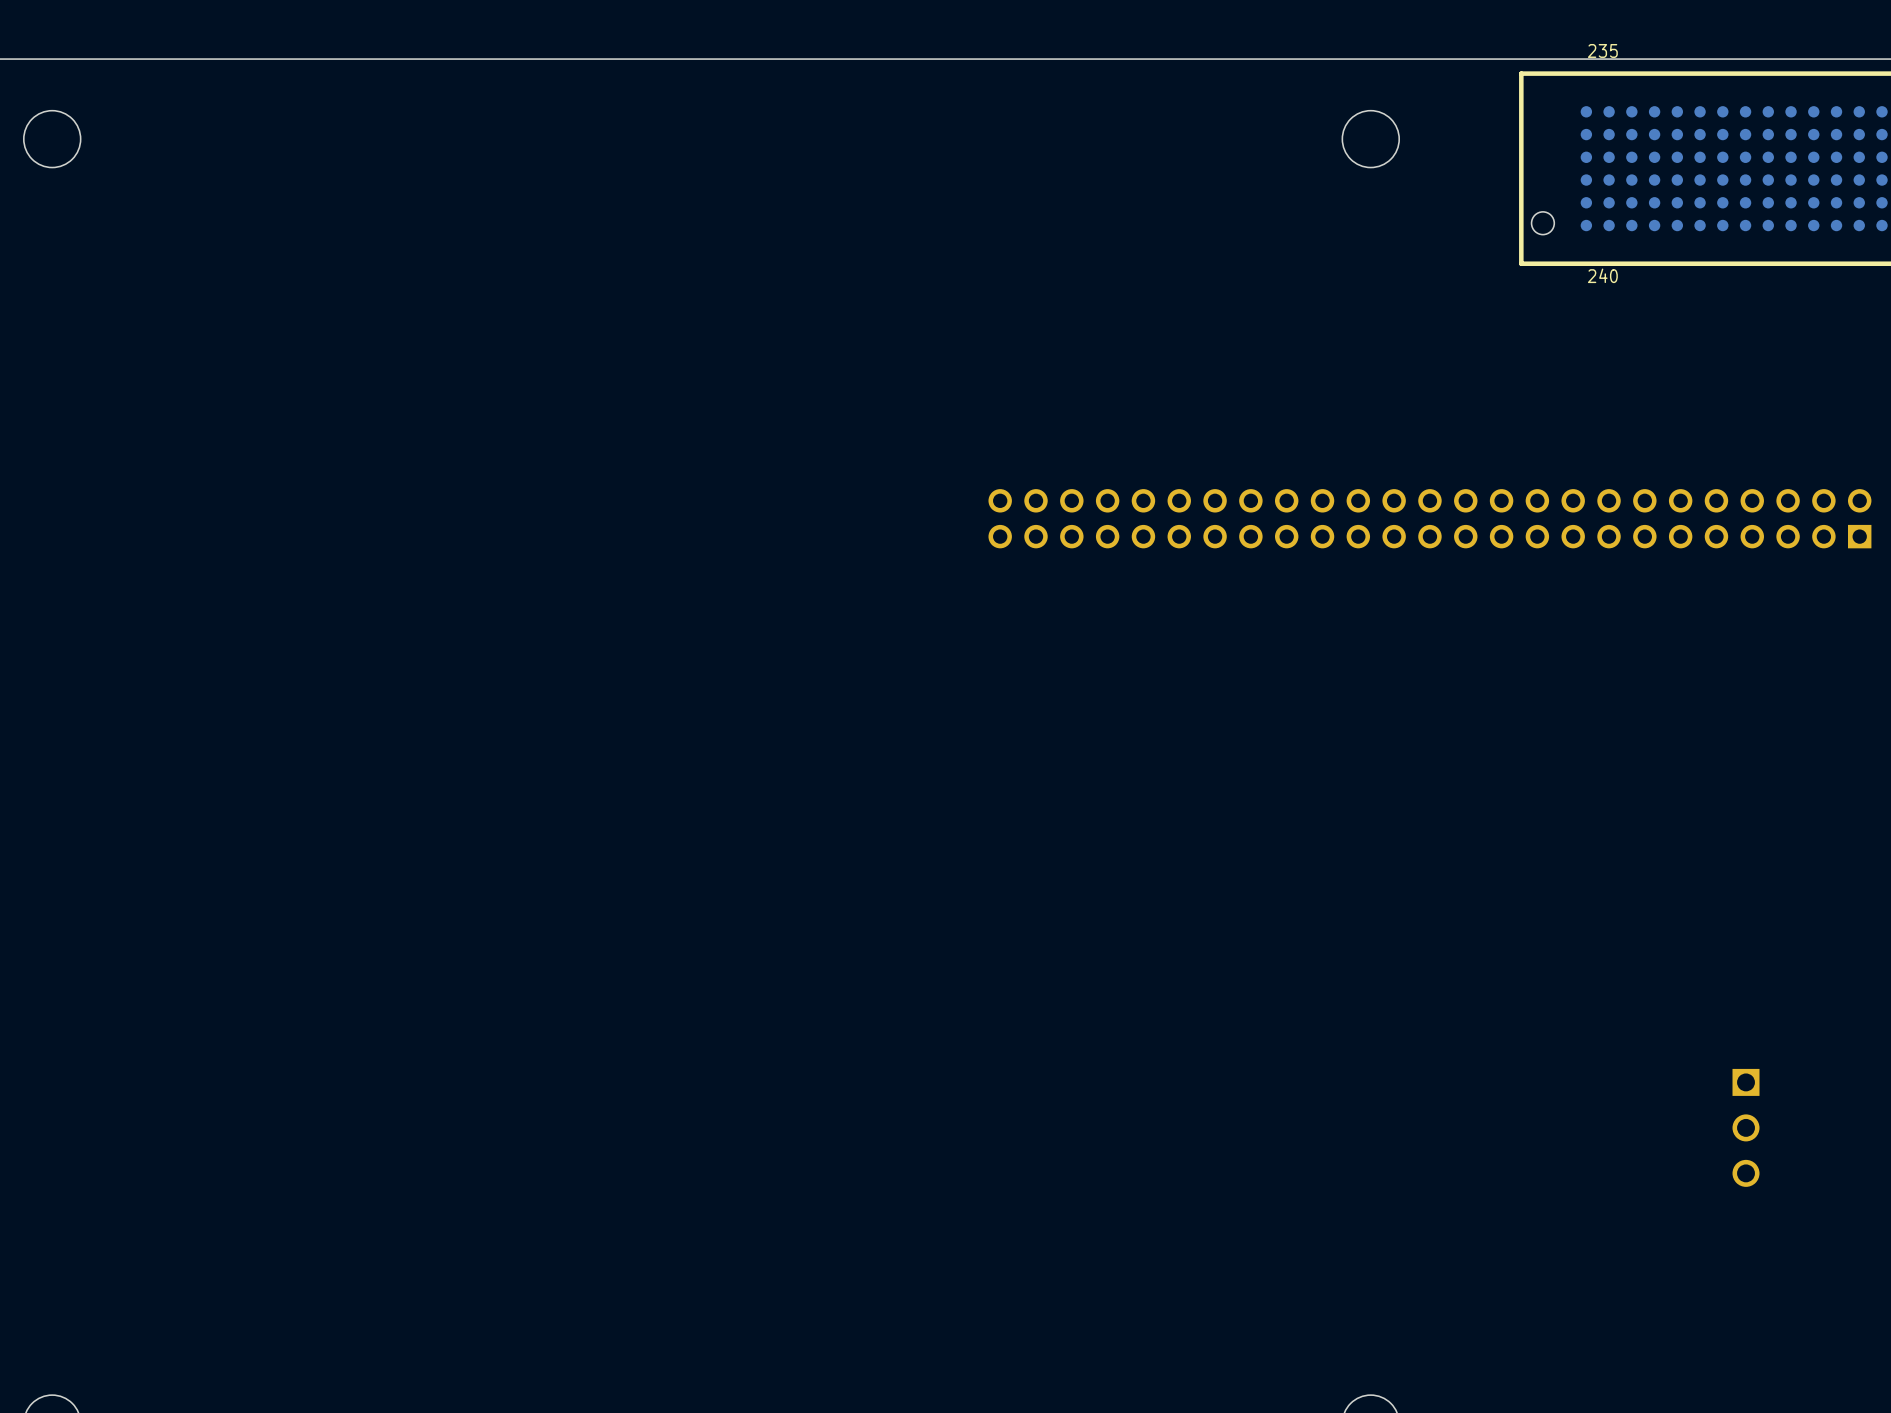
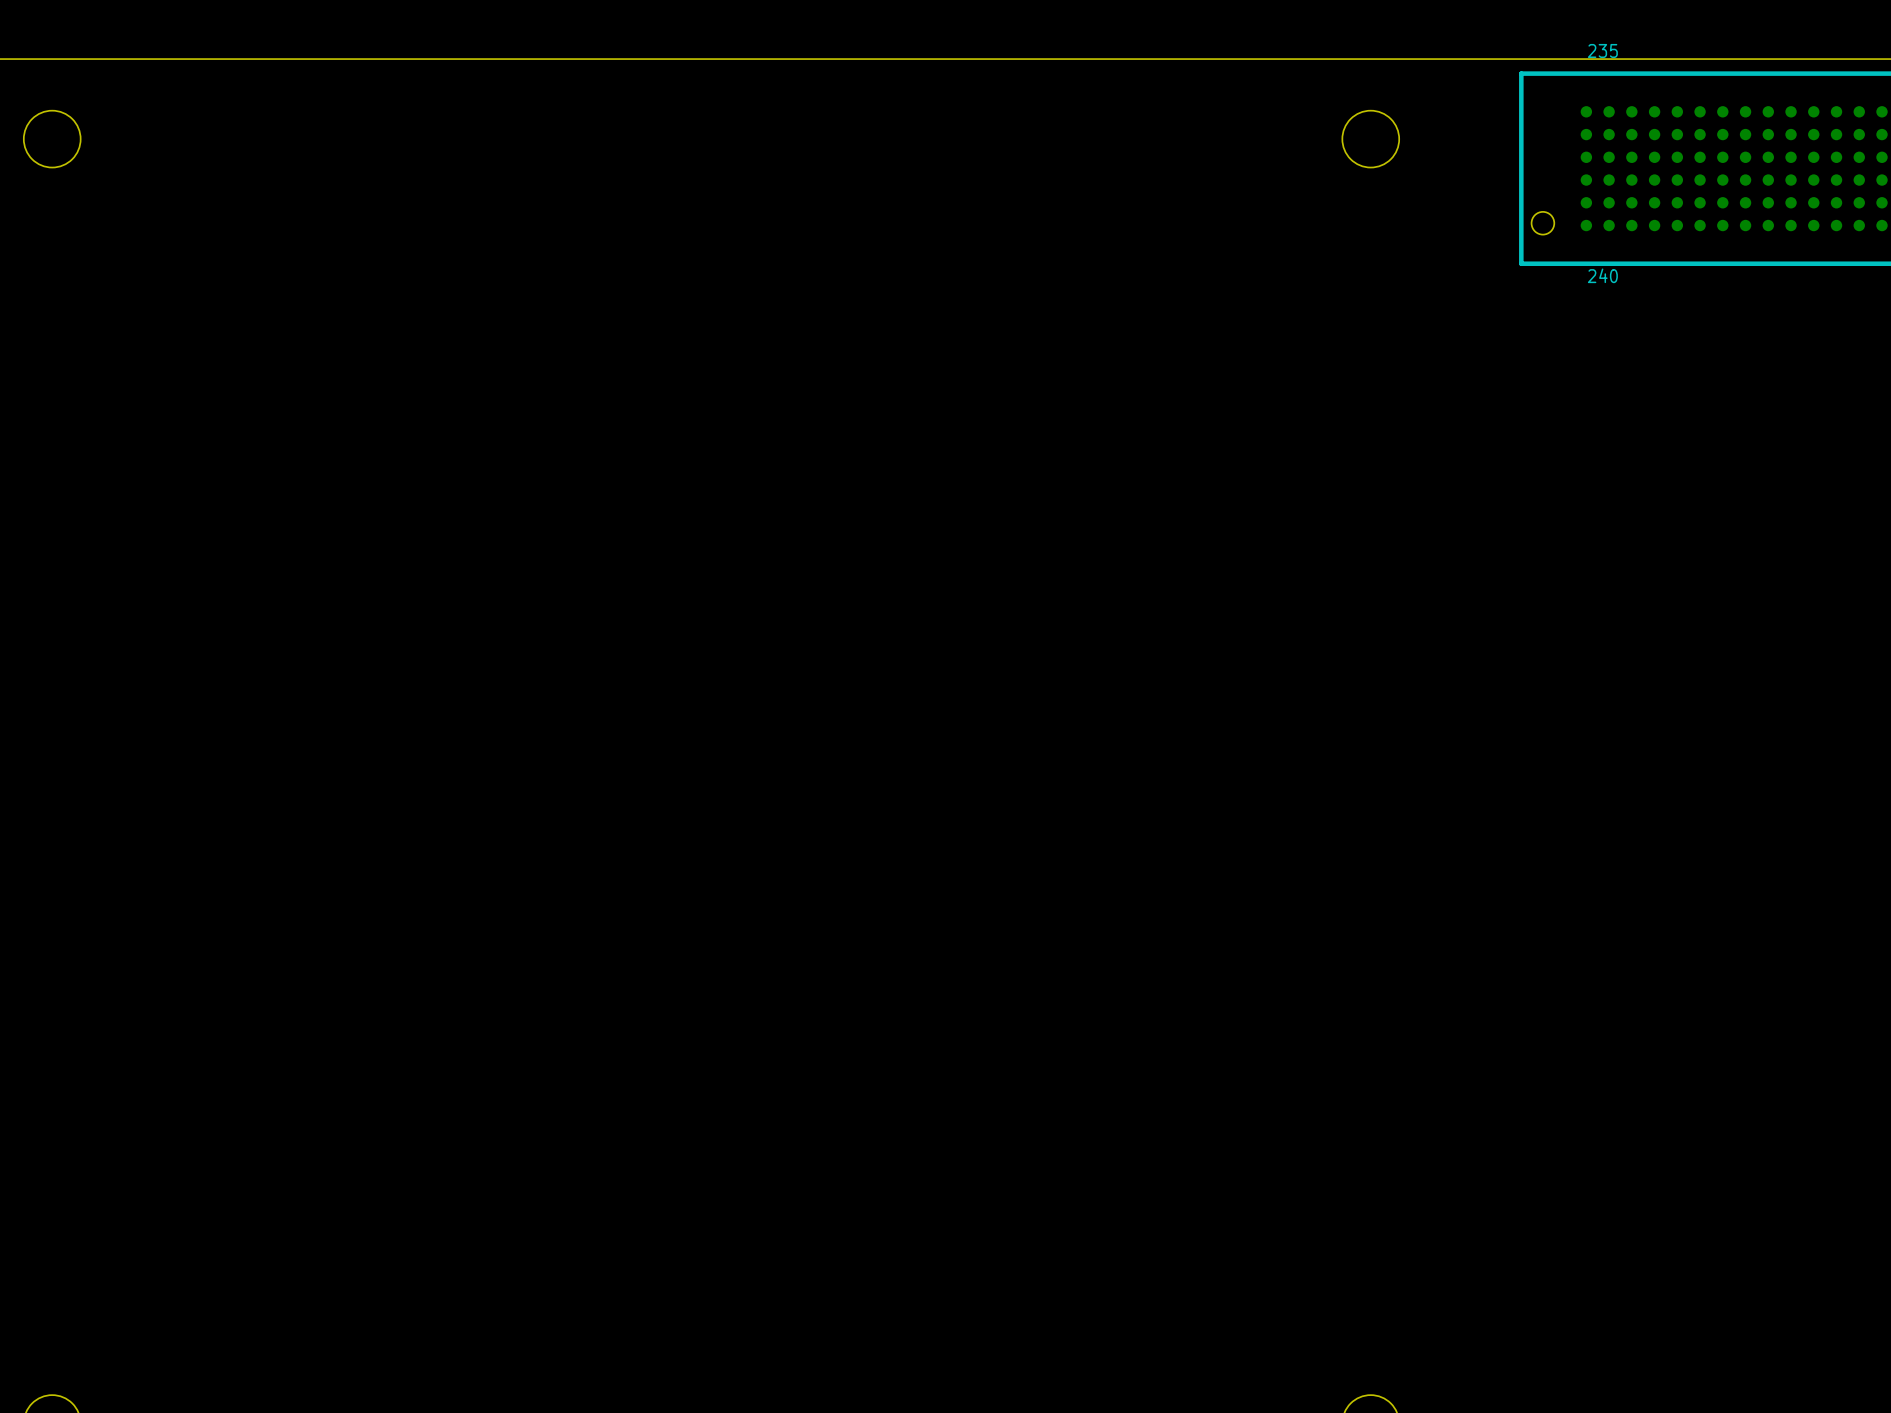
part: (1429, 518) -> none
part: (1746, 1127) -> none

